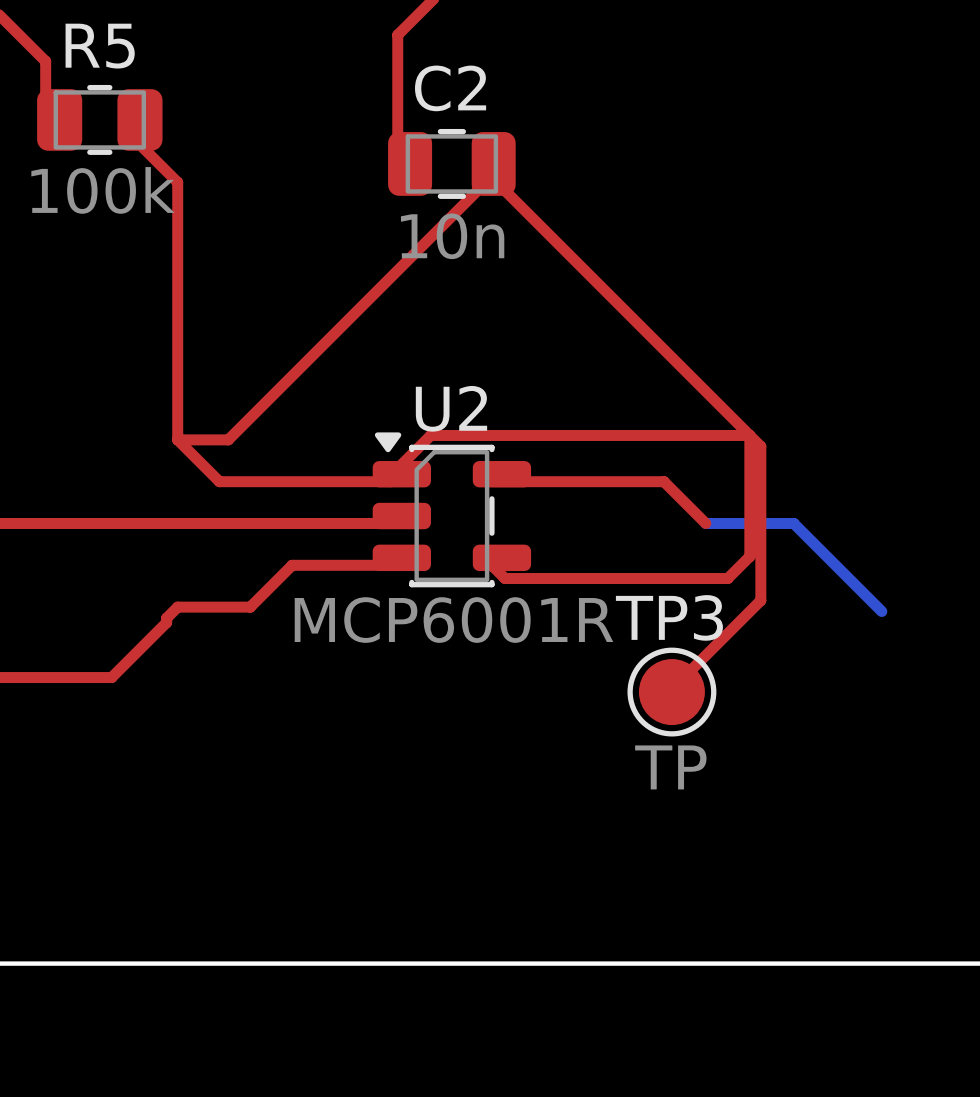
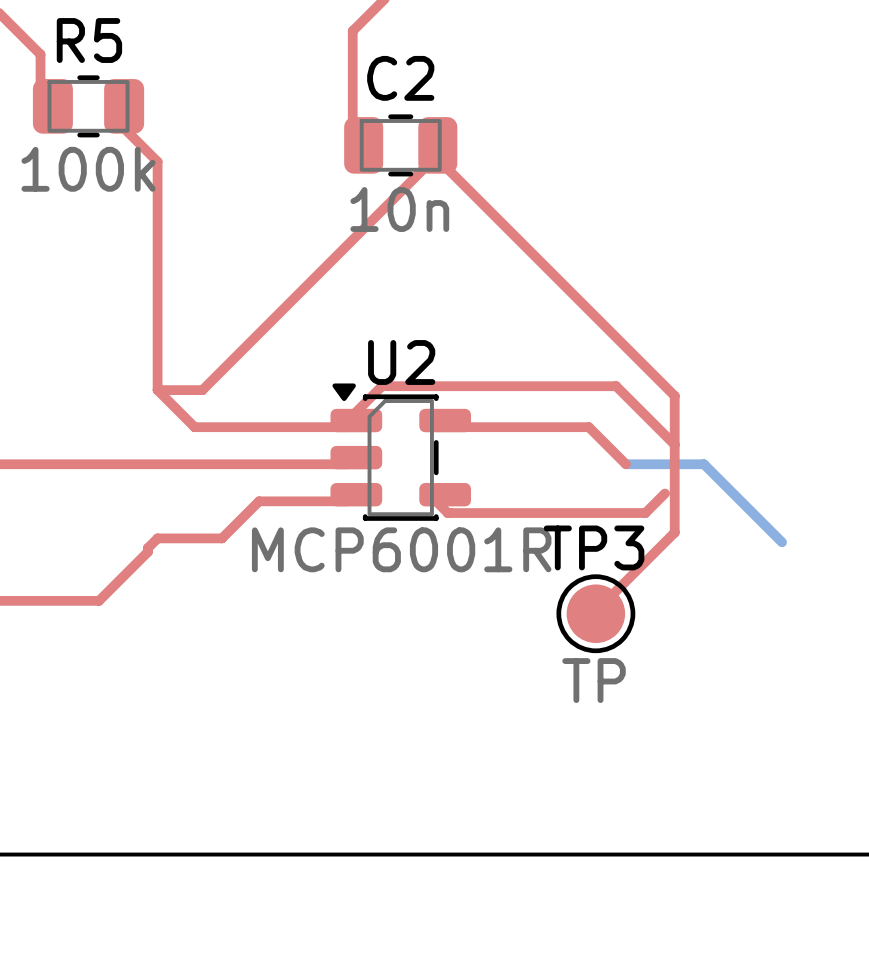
top track: (694, 435) (749, 435) (749, 556) -> (616, 386) (674, 444)

